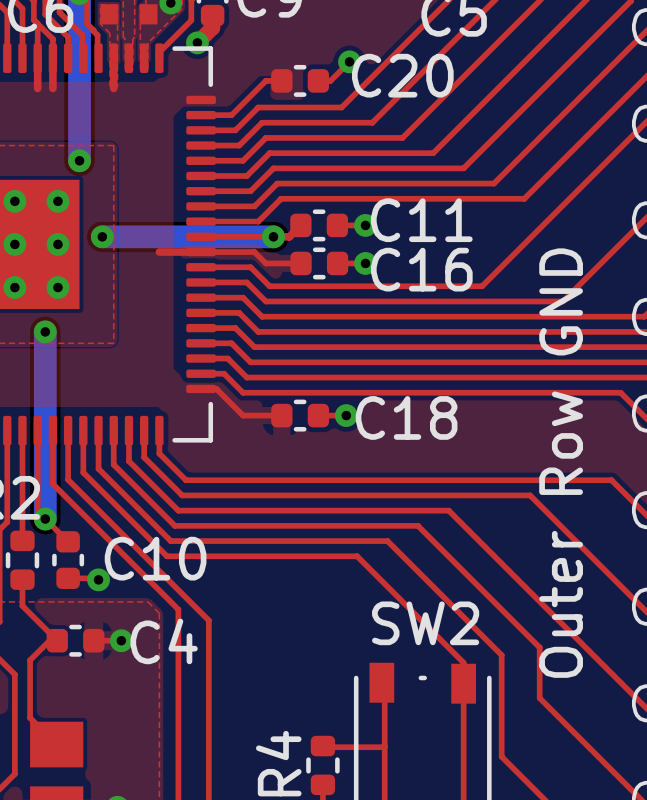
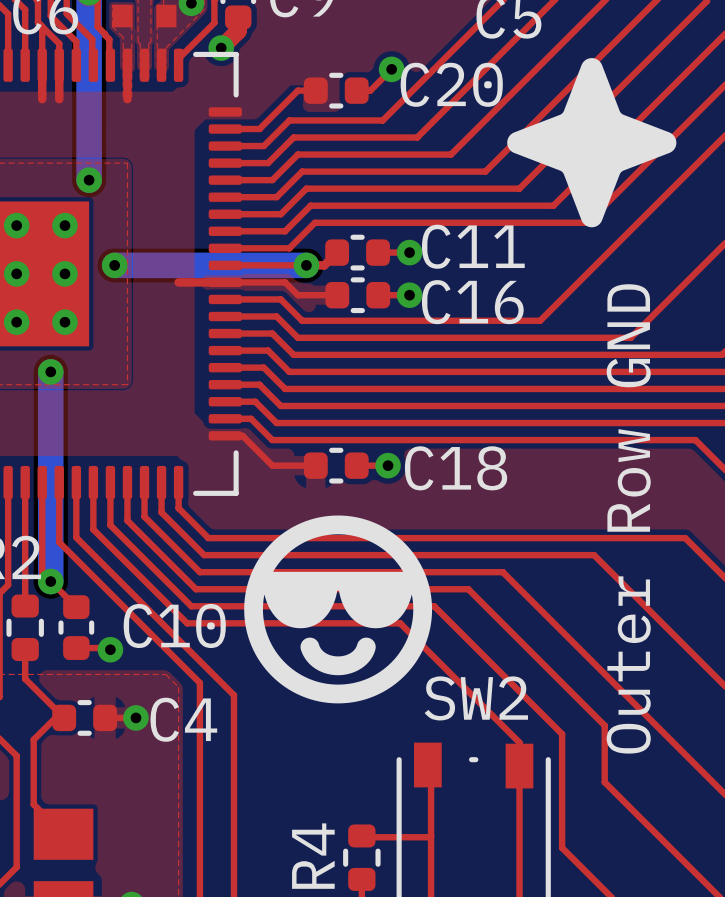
drawing: none -> [507, 58, 677, 228]
drawing: none -> [244, 515, 433, 704]

